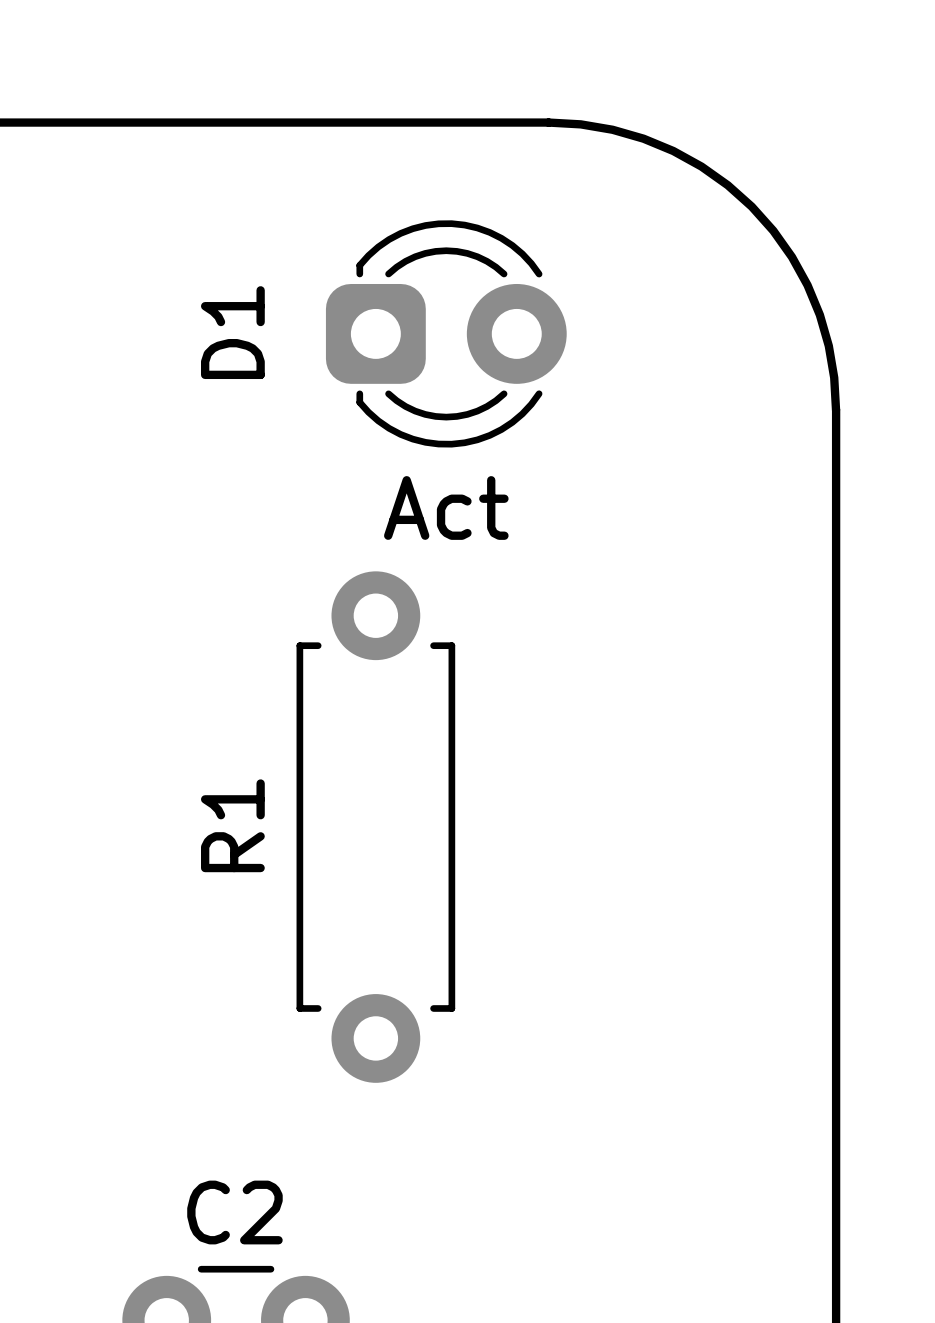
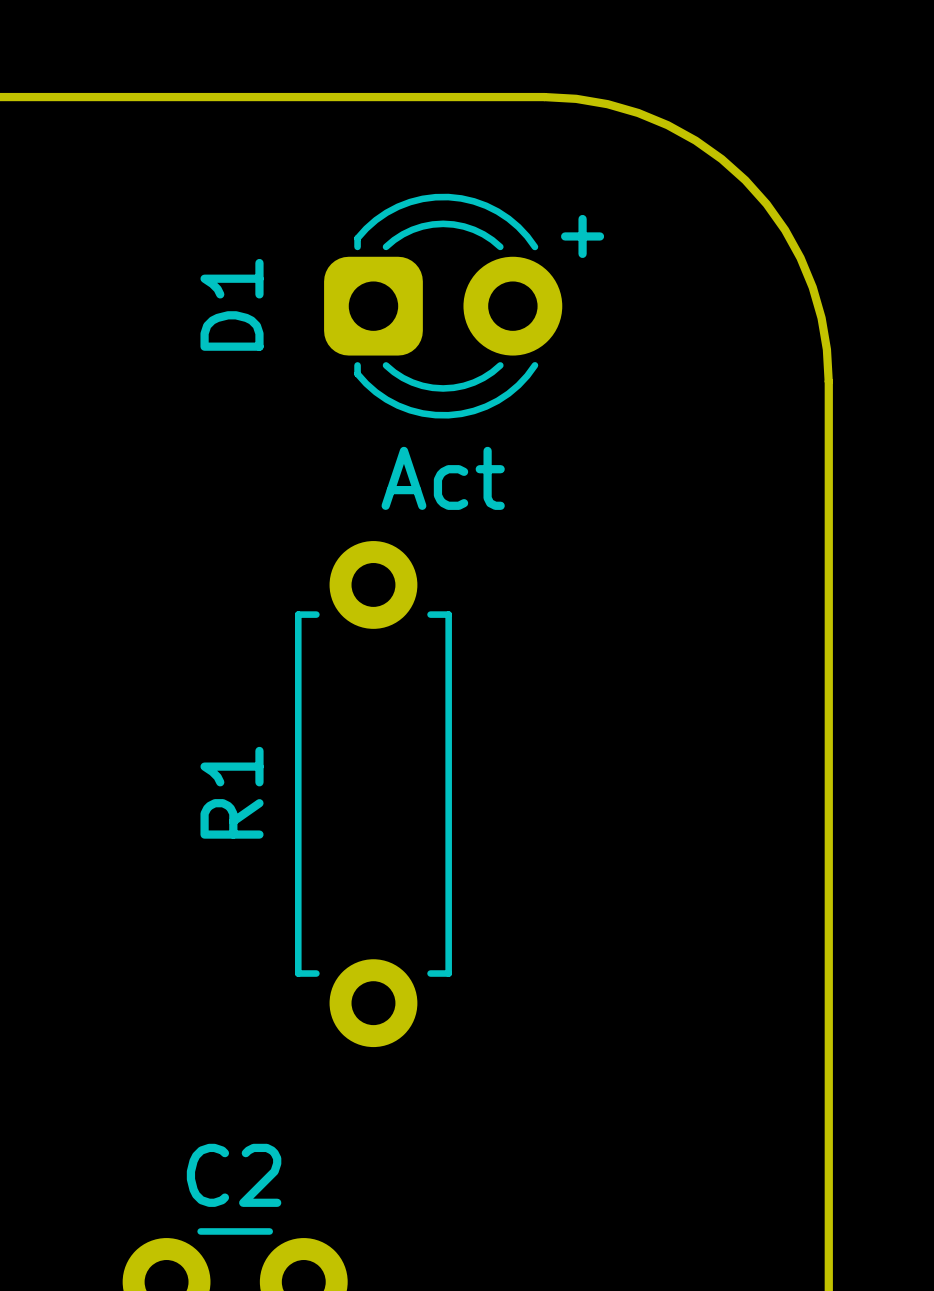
line: none -> (582, 219) (582, 253)
line: none -> (565, 236) (599, 236)

